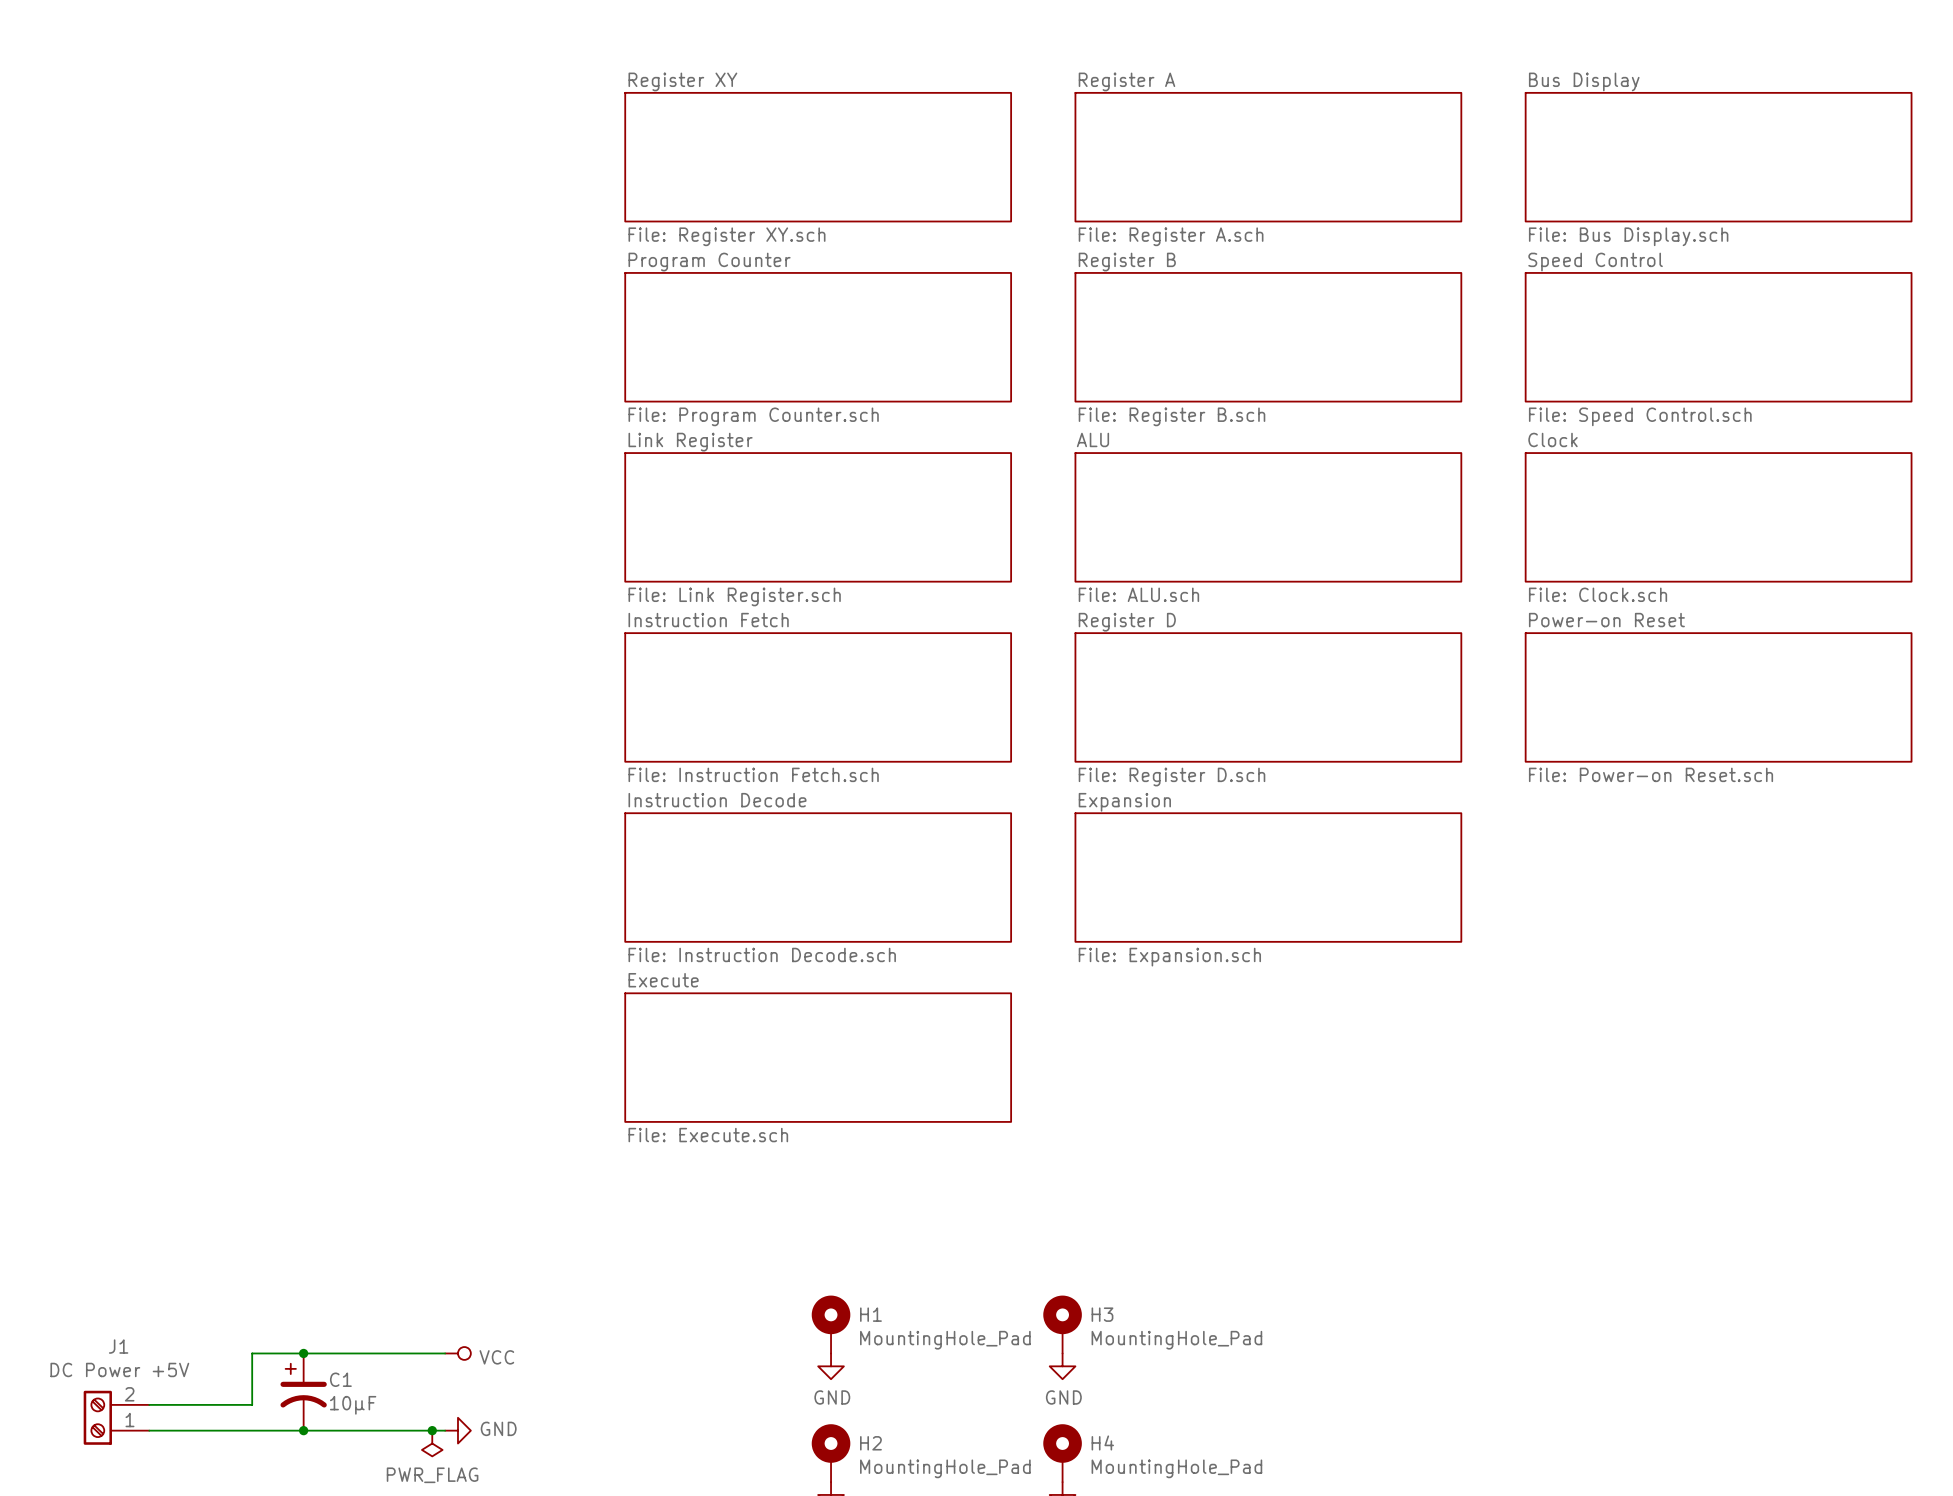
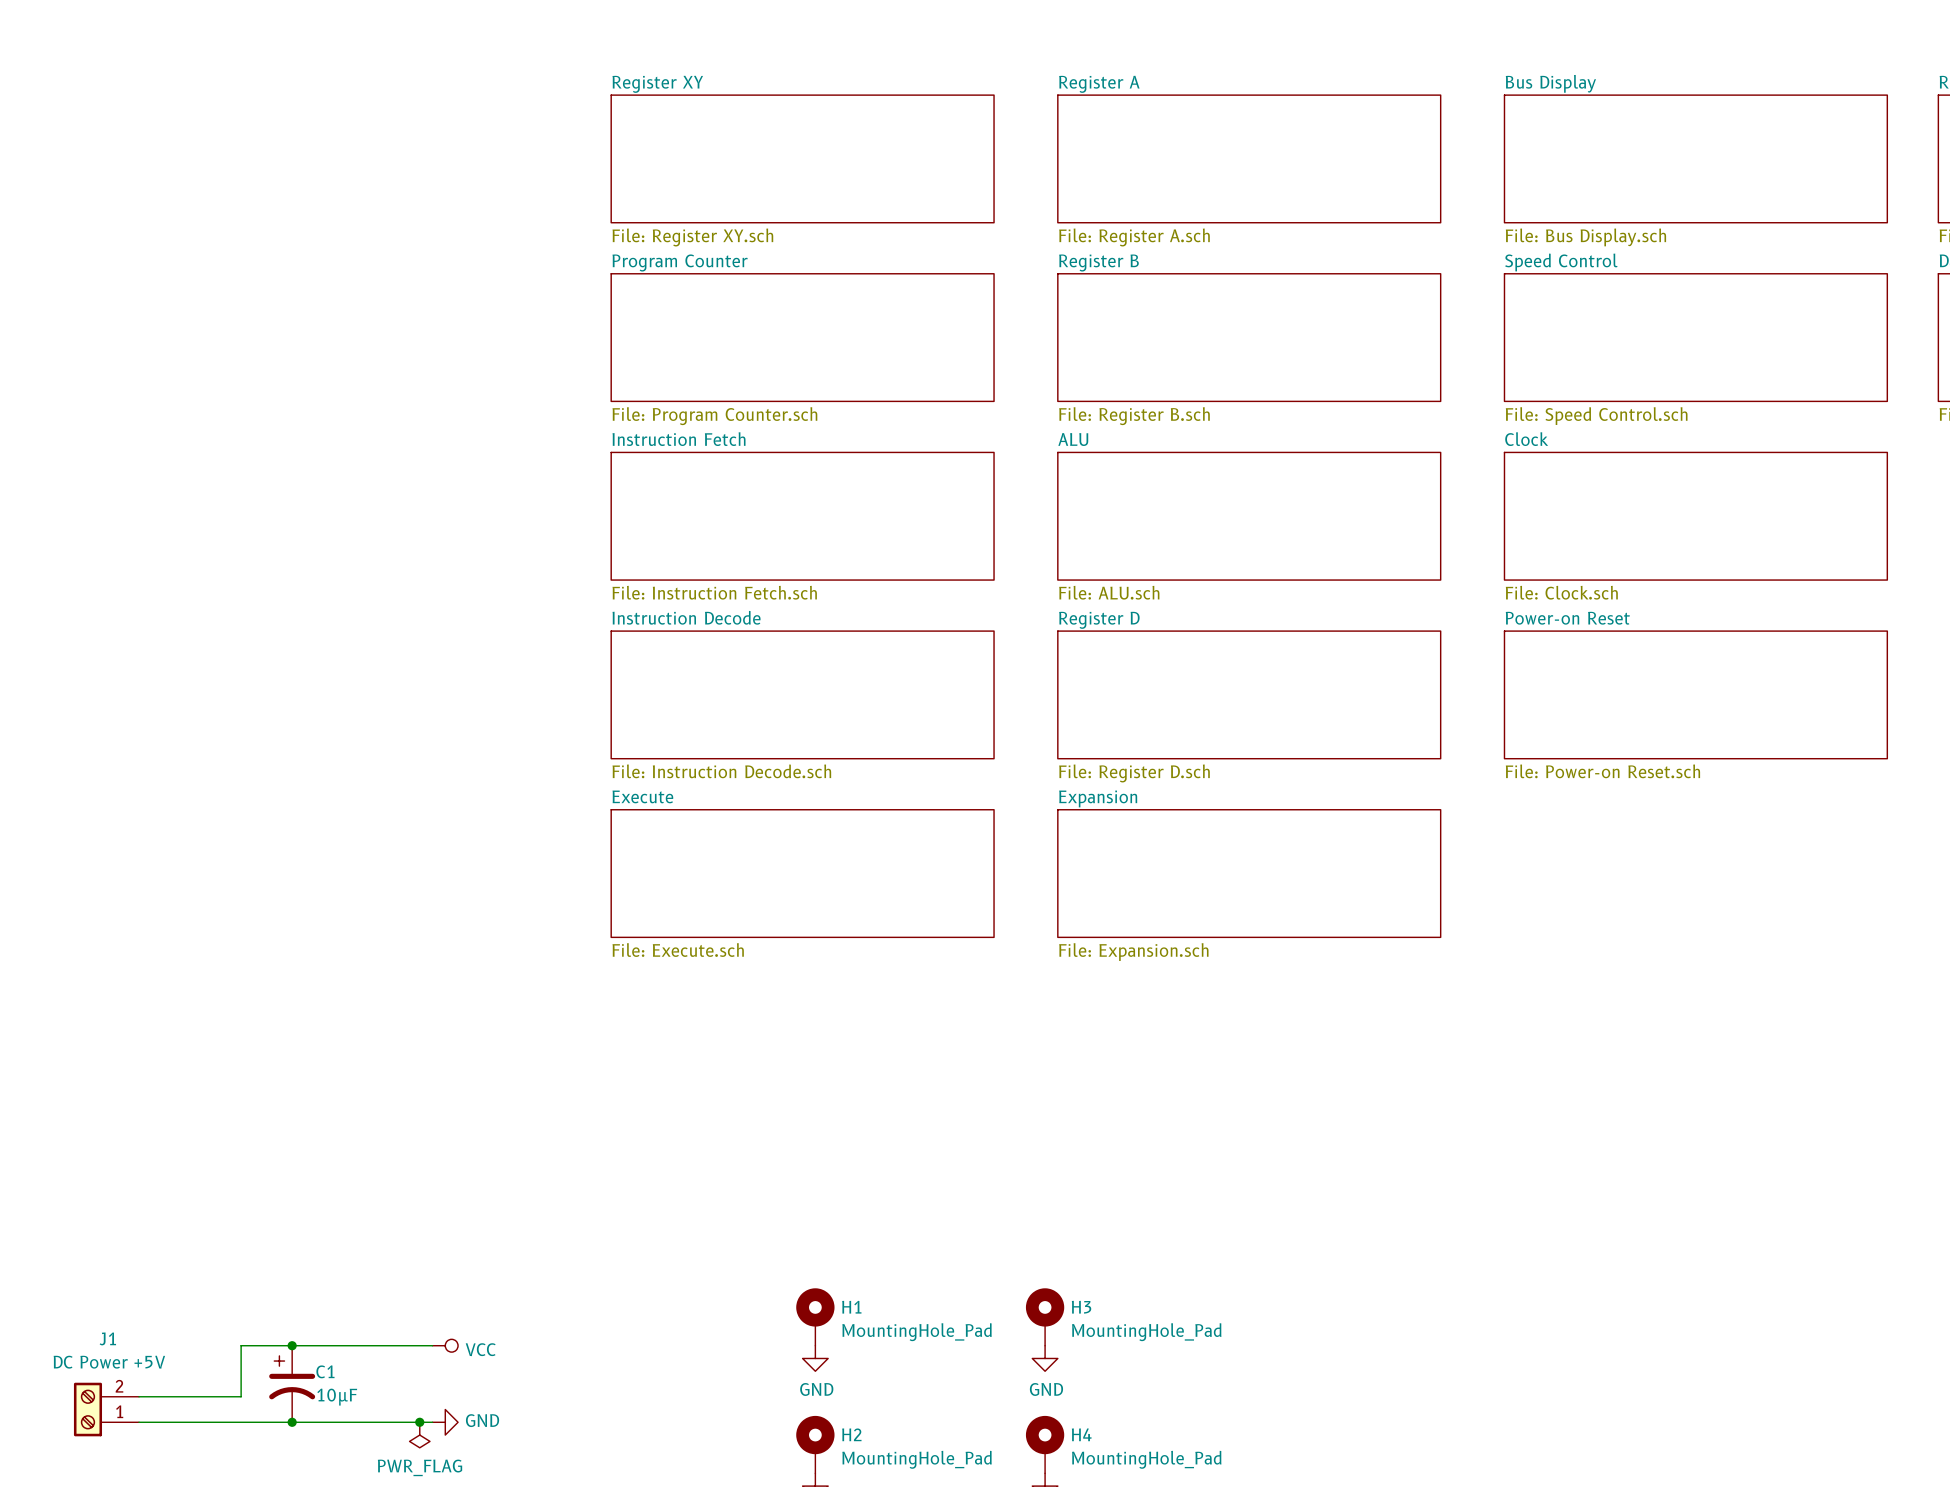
sheet Link Register name: Link Register (690, 442) -> Instruction Fetch (679, 439)
sheet Link Register value: File: Link Register.sch (734, 596) -> File: Instruction Fetch.sch (714, 592)
sheet Instruction Fetch name: Instruction Fetch (708, 620) -> Instruction Decode (686, 617)
sheet Instruction Fetch value: File: Instruction Fetch.sch (753, 774) -> File: Instruction Decode.sch (721, 771)
sheet Instruction Decode name: Instruction Decode (717, 800) -> Execute (642, 796)
sheet Instruction Decode value: File: Instruction Decode.sch (762, 954) -> File: Execute.sch (678, 950)
sheet Execute: File: Execute.sch (818, 1057) -> none

